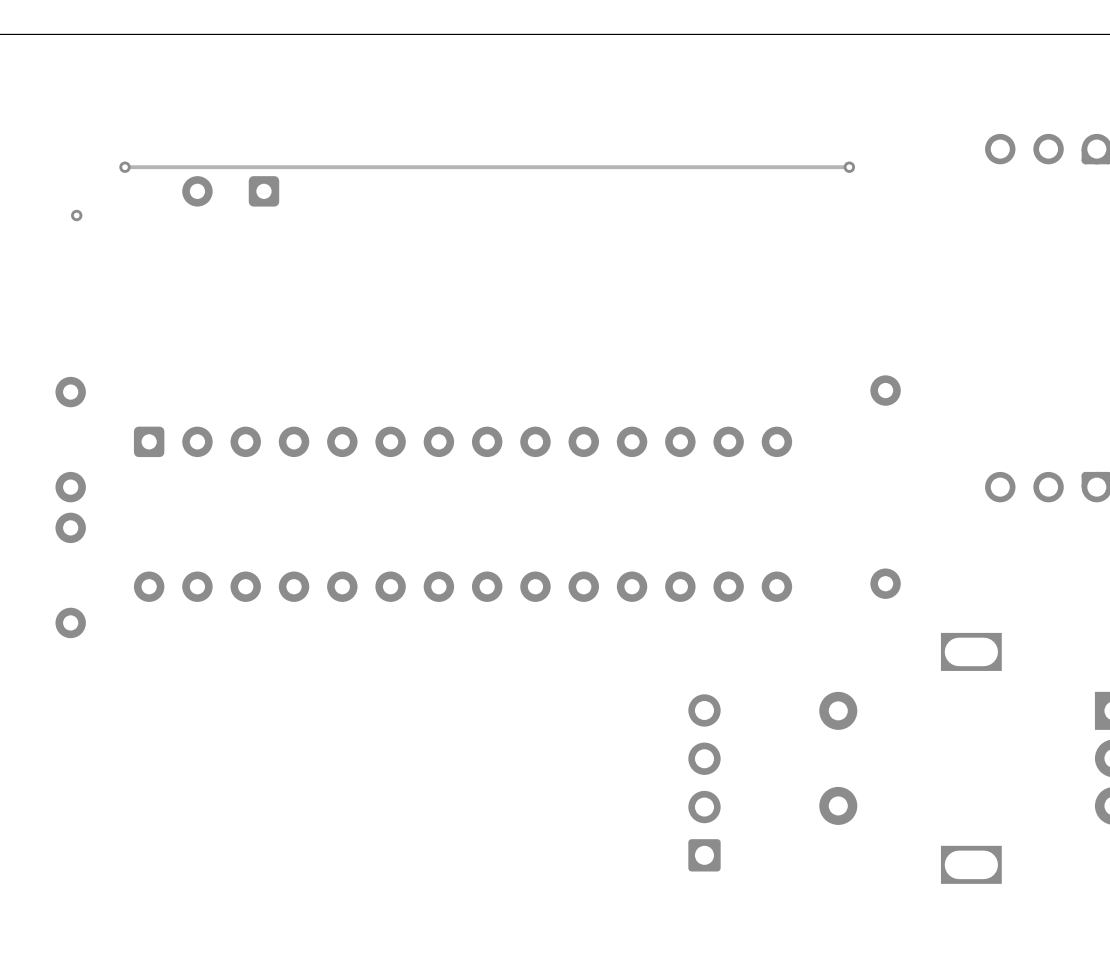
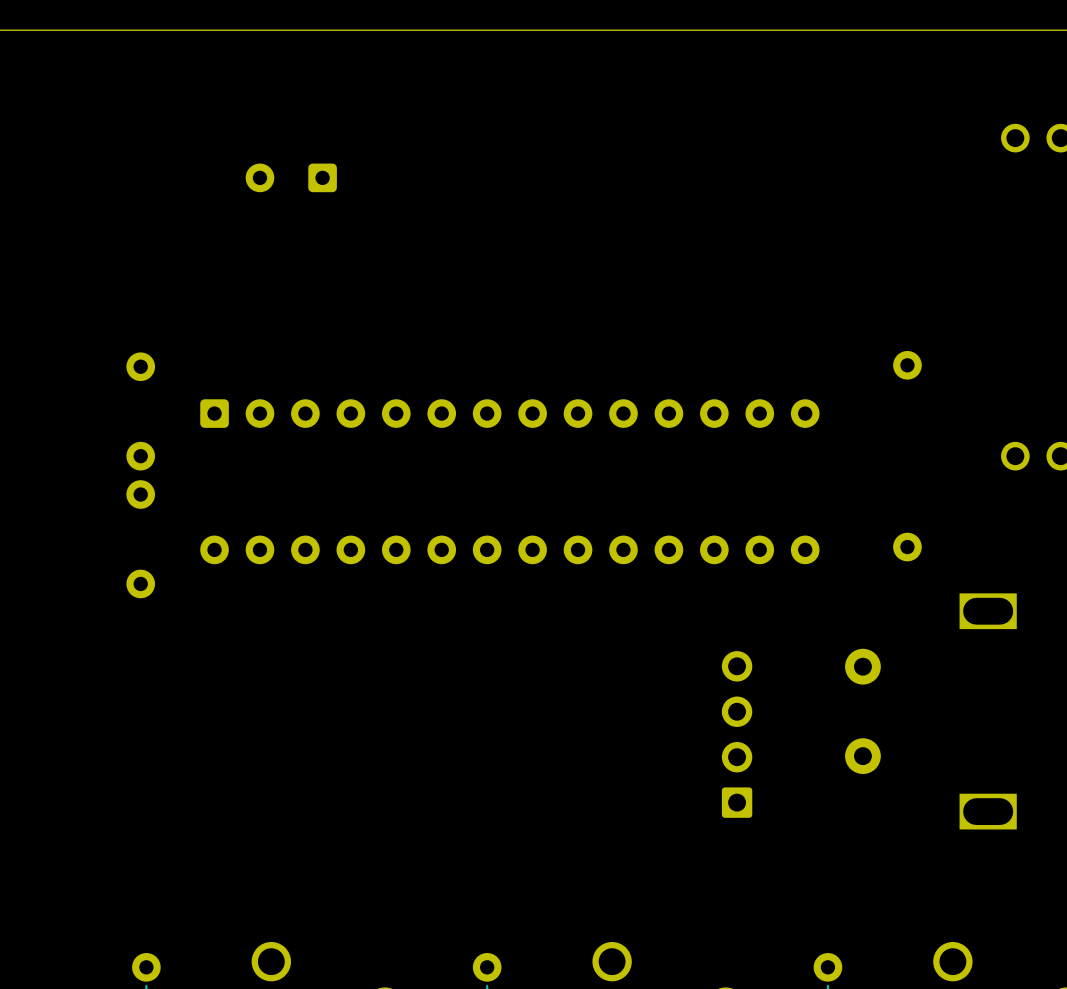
via: (125, 167) -> none
track: (849, 167) (125, 167) -> none
via: (849, 167) -> none
via: (76, 215) -> none

